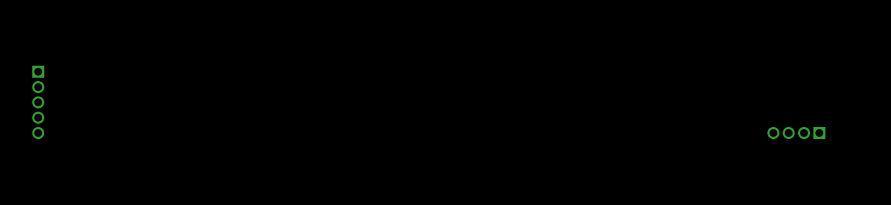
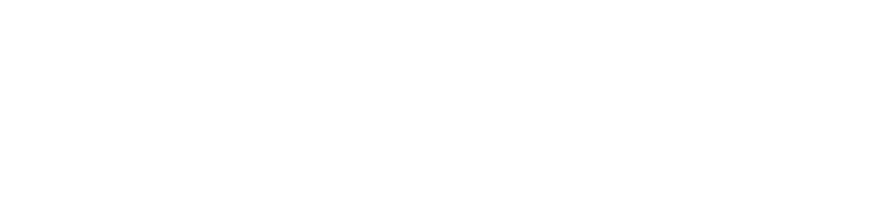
part: (38, 102) -> none
part: (796, 133) -> none

